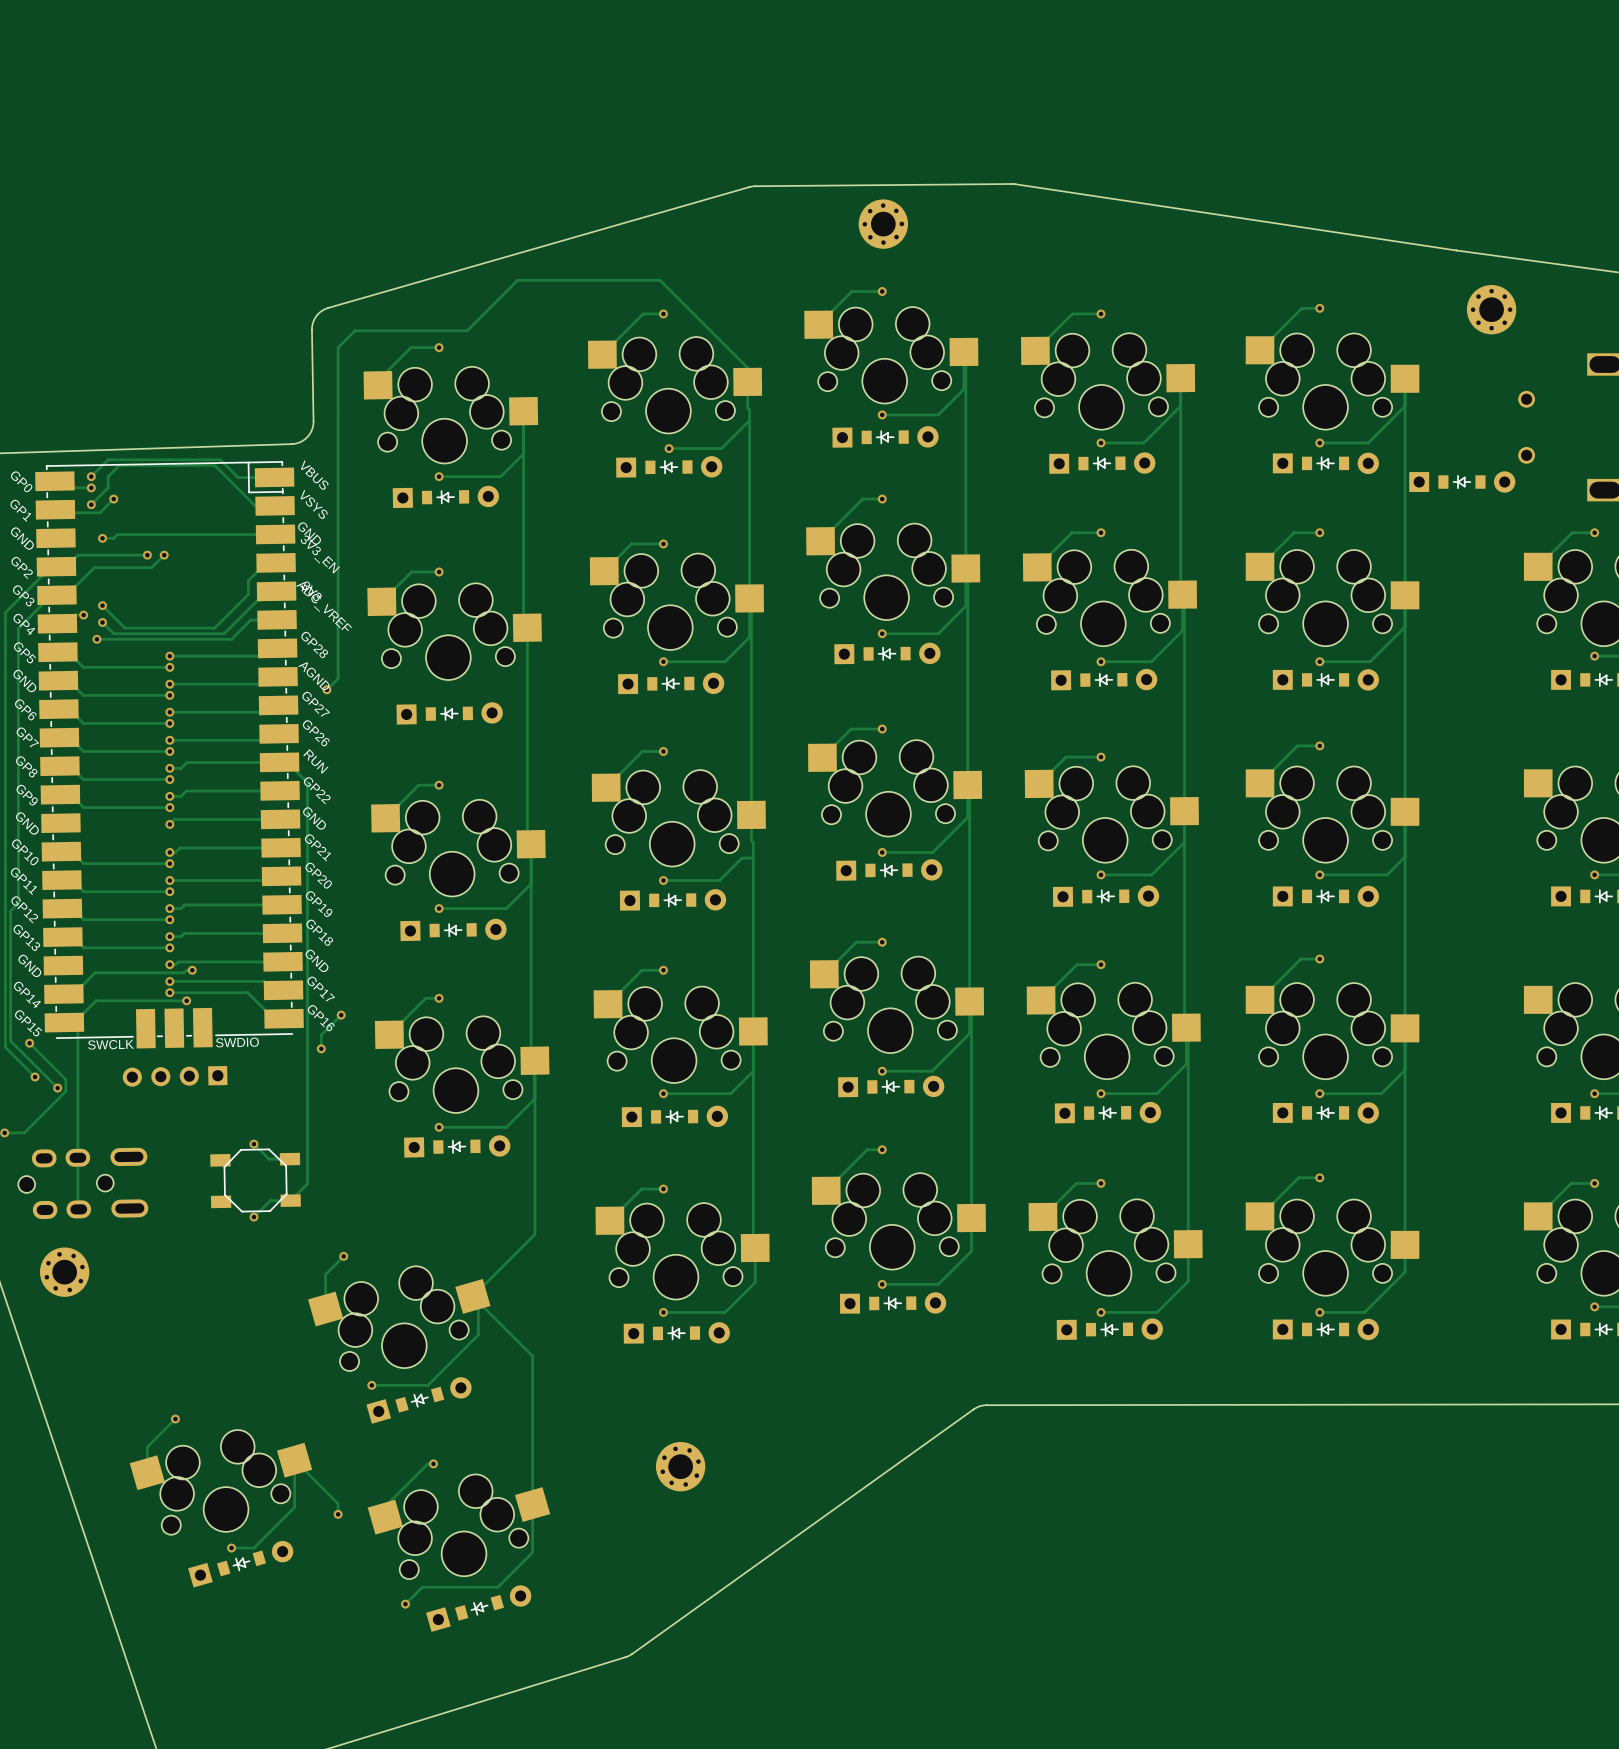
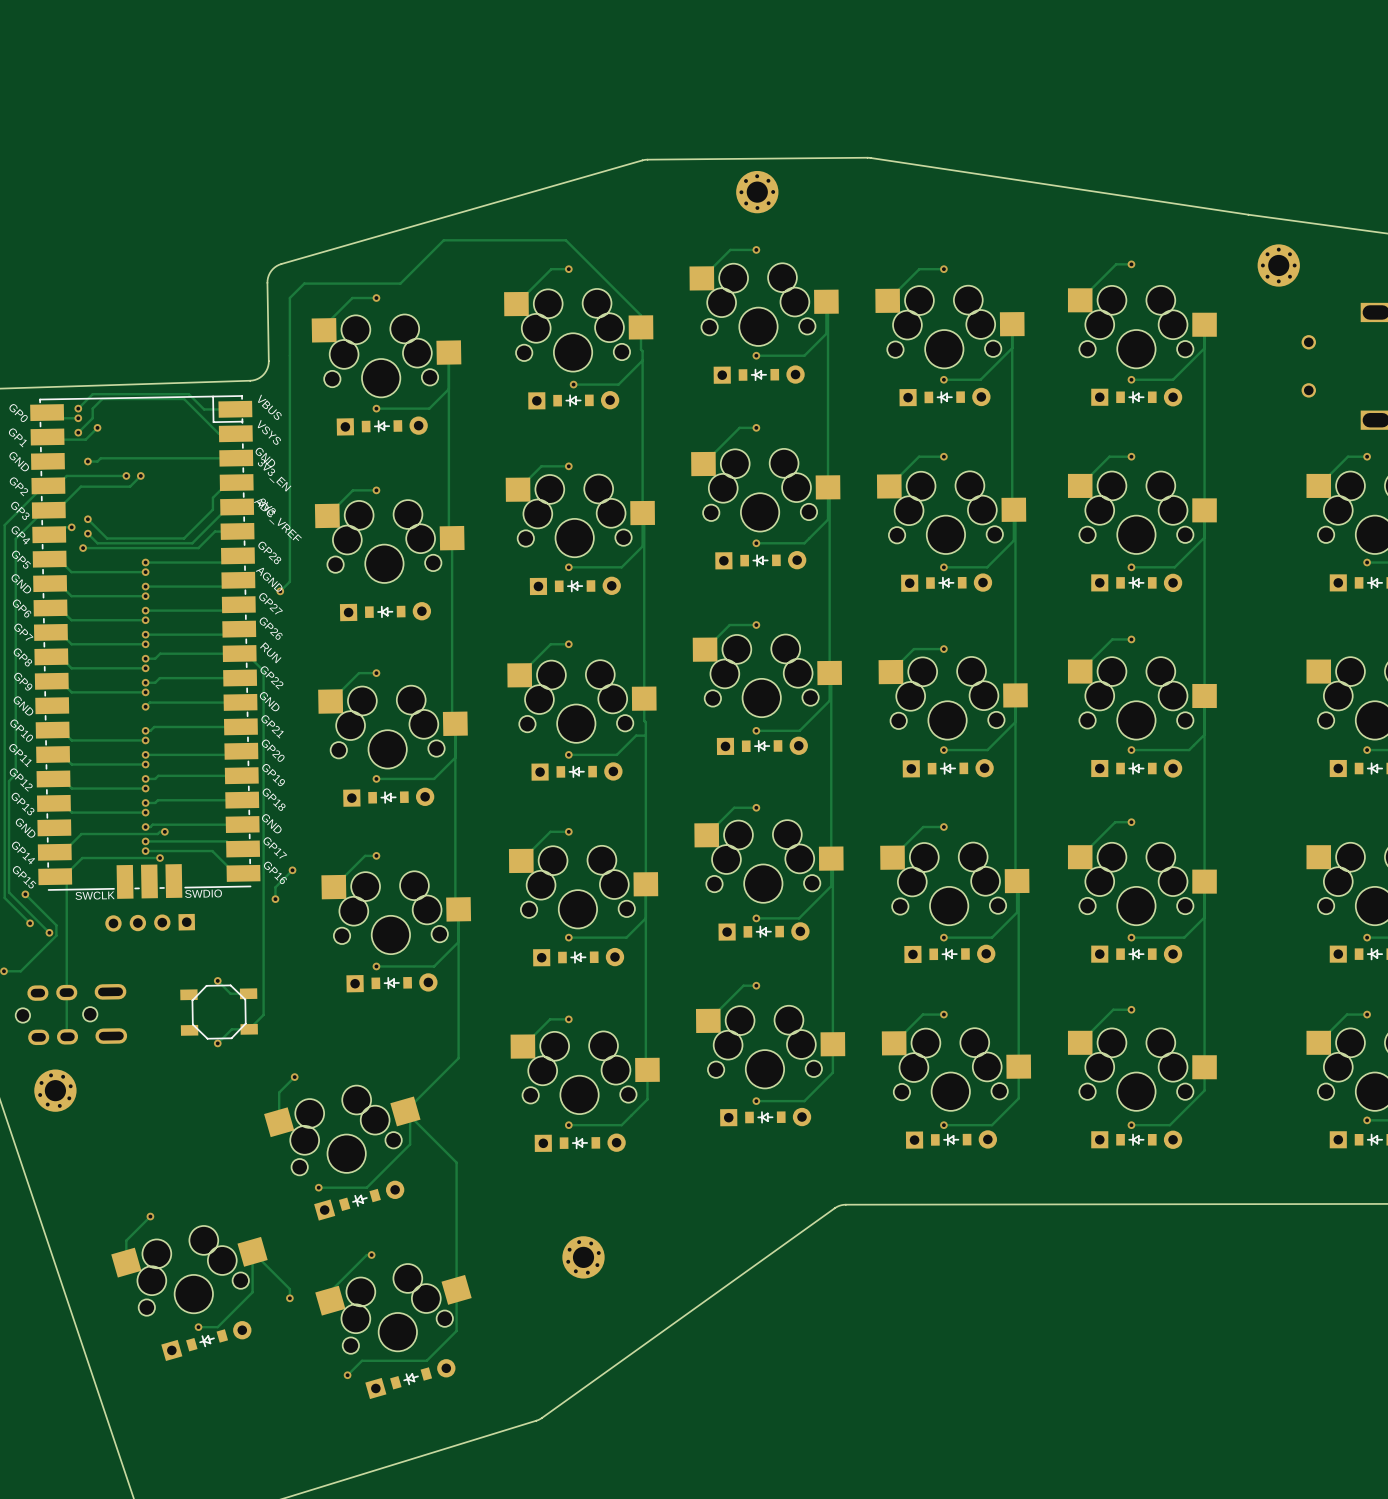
part: (1462, 482) -> none

